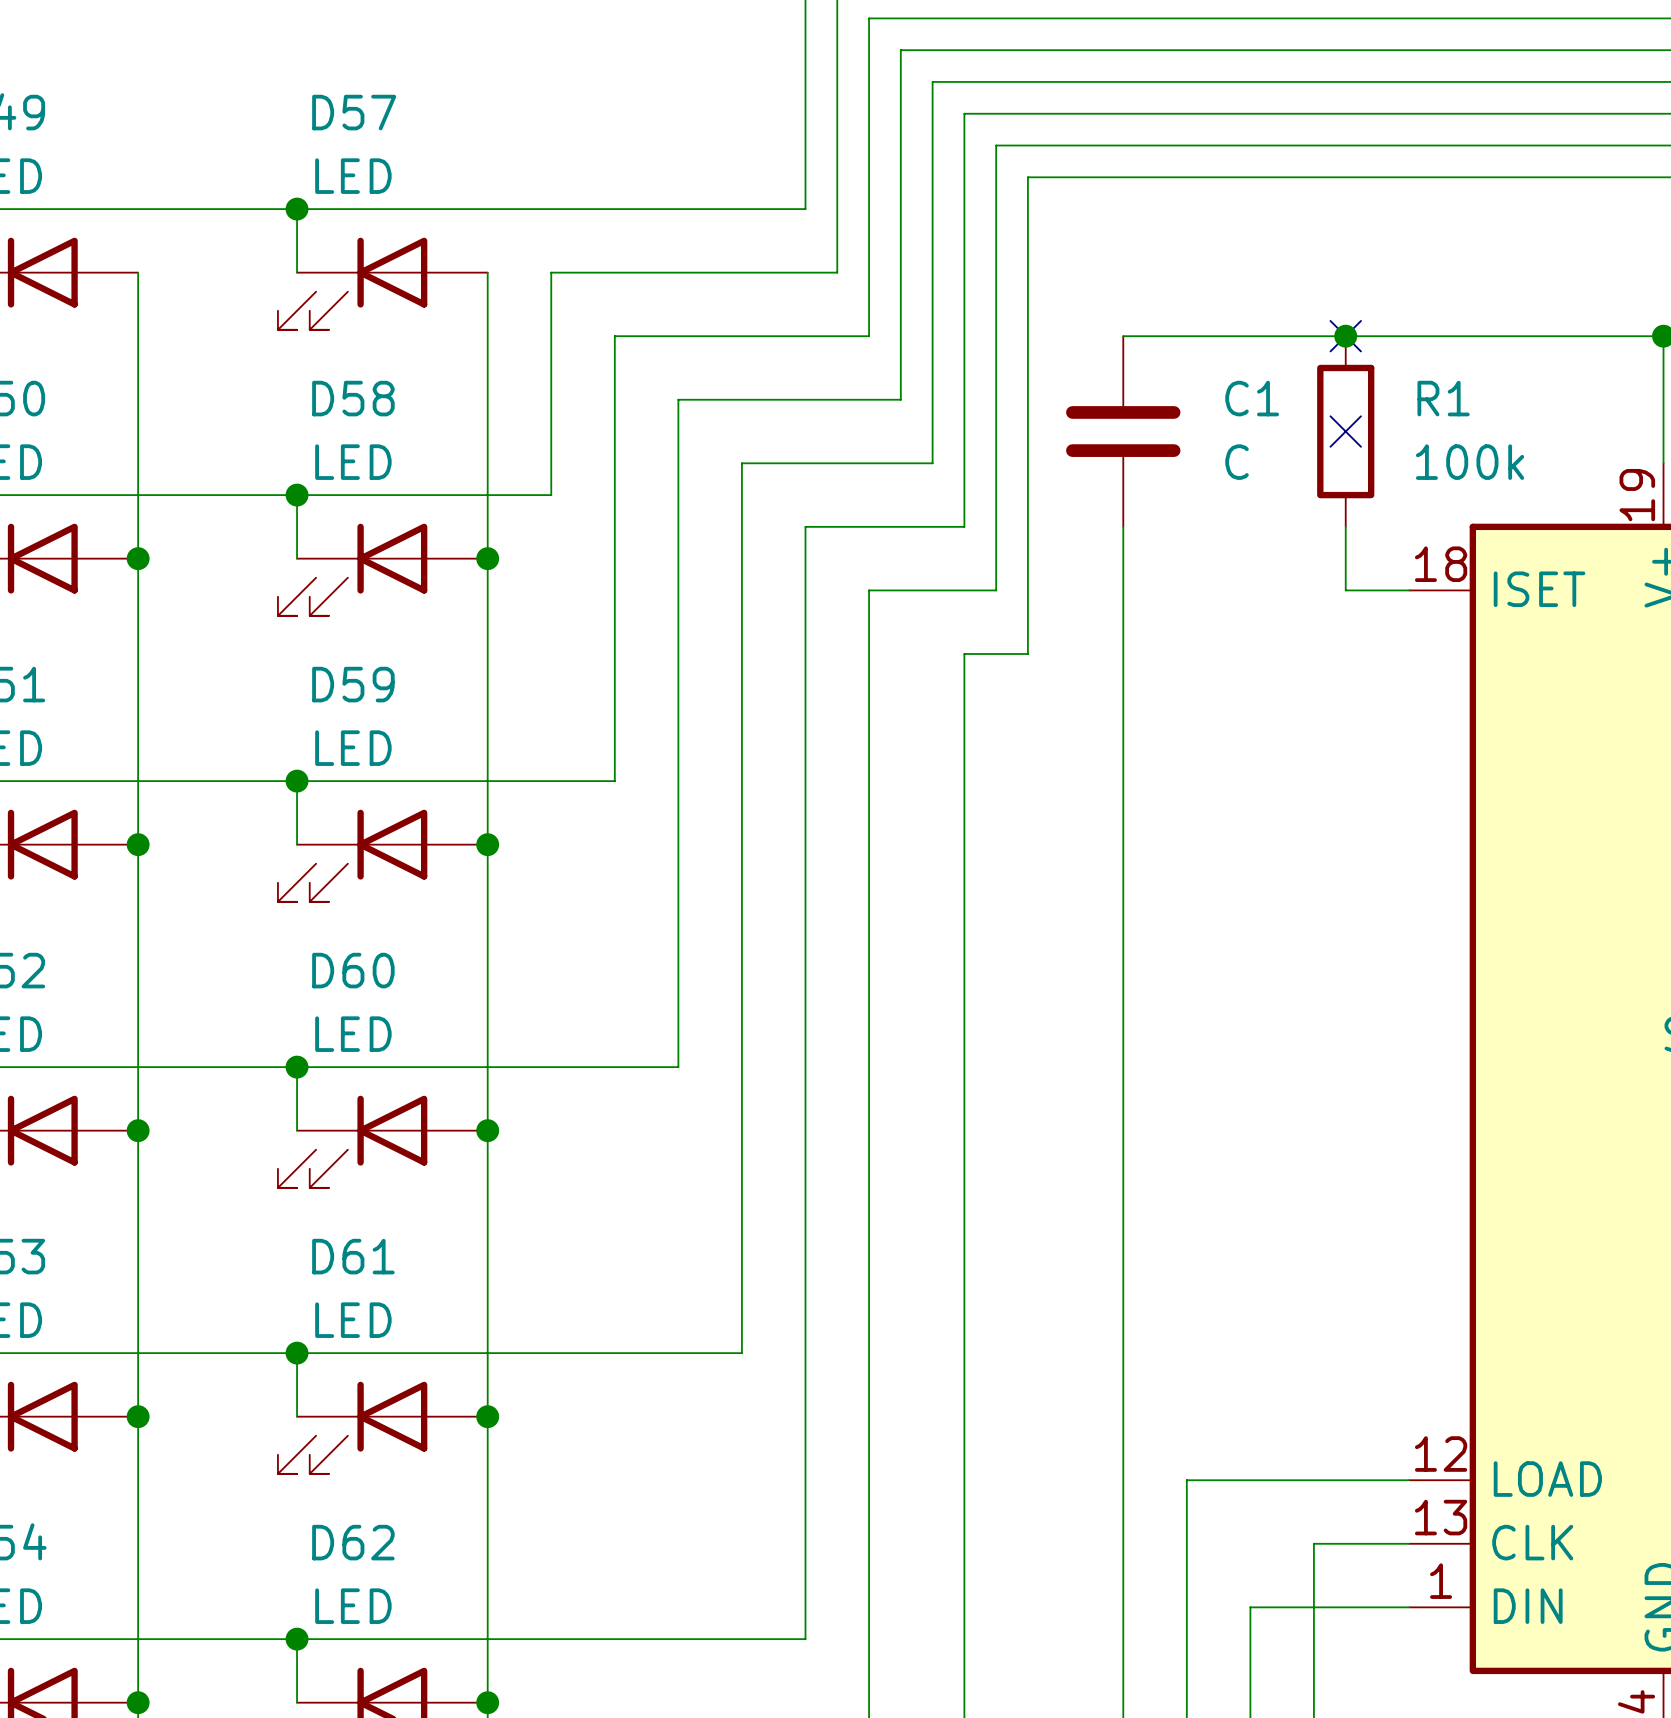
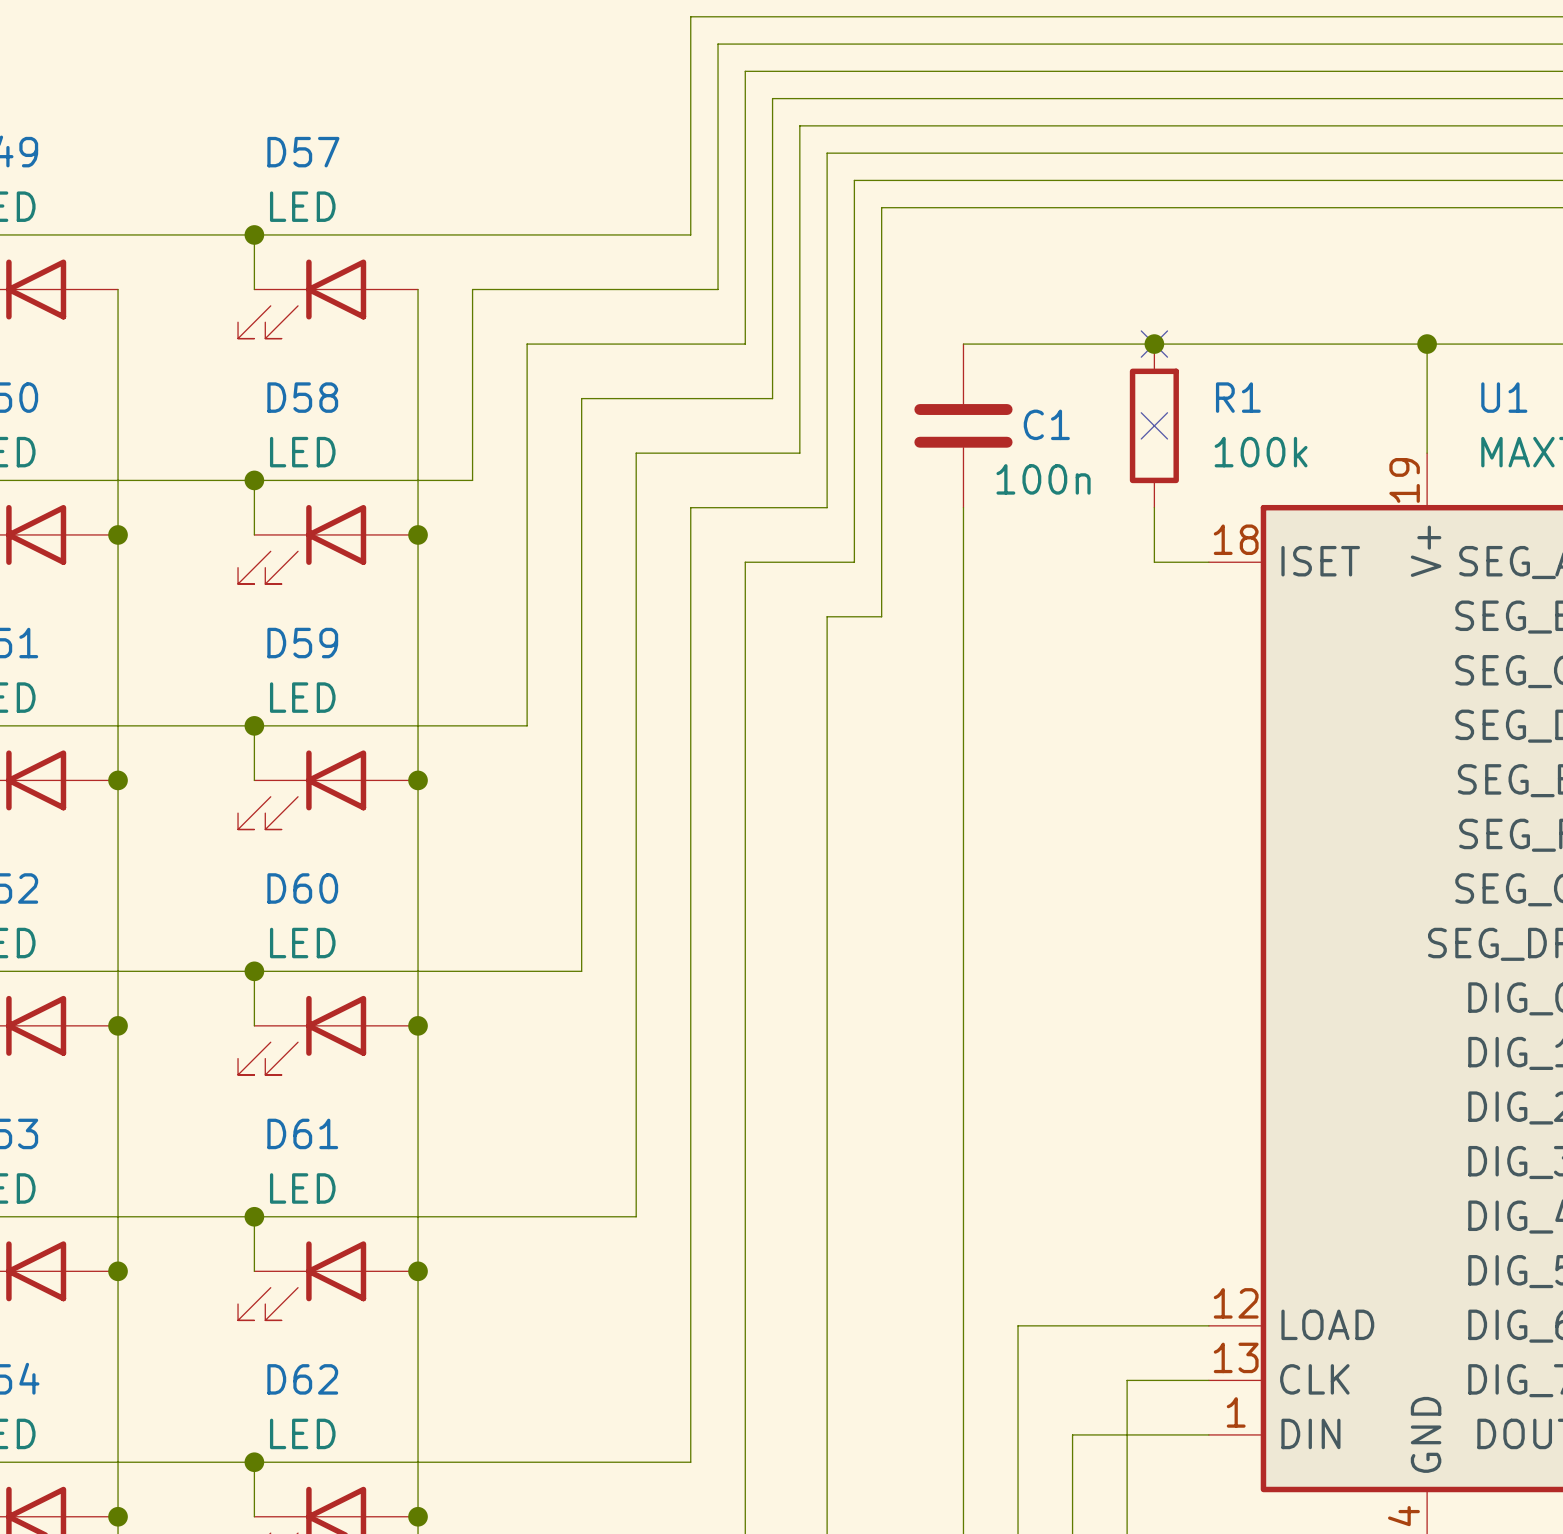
C1 name position: C1 (1252, 398) -> C1 (1046, 424)
C1 value: C (1237, 462) -> 100n (1043, 479)

